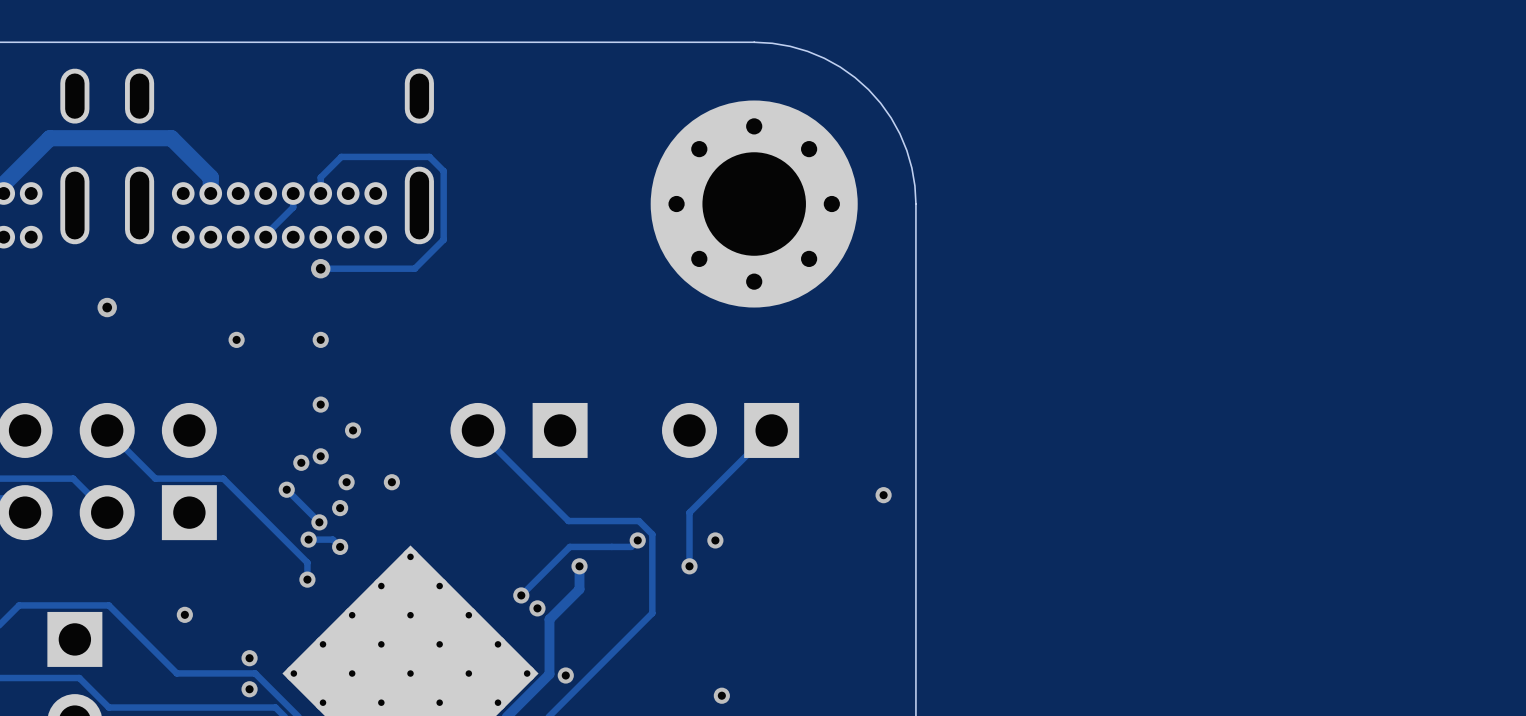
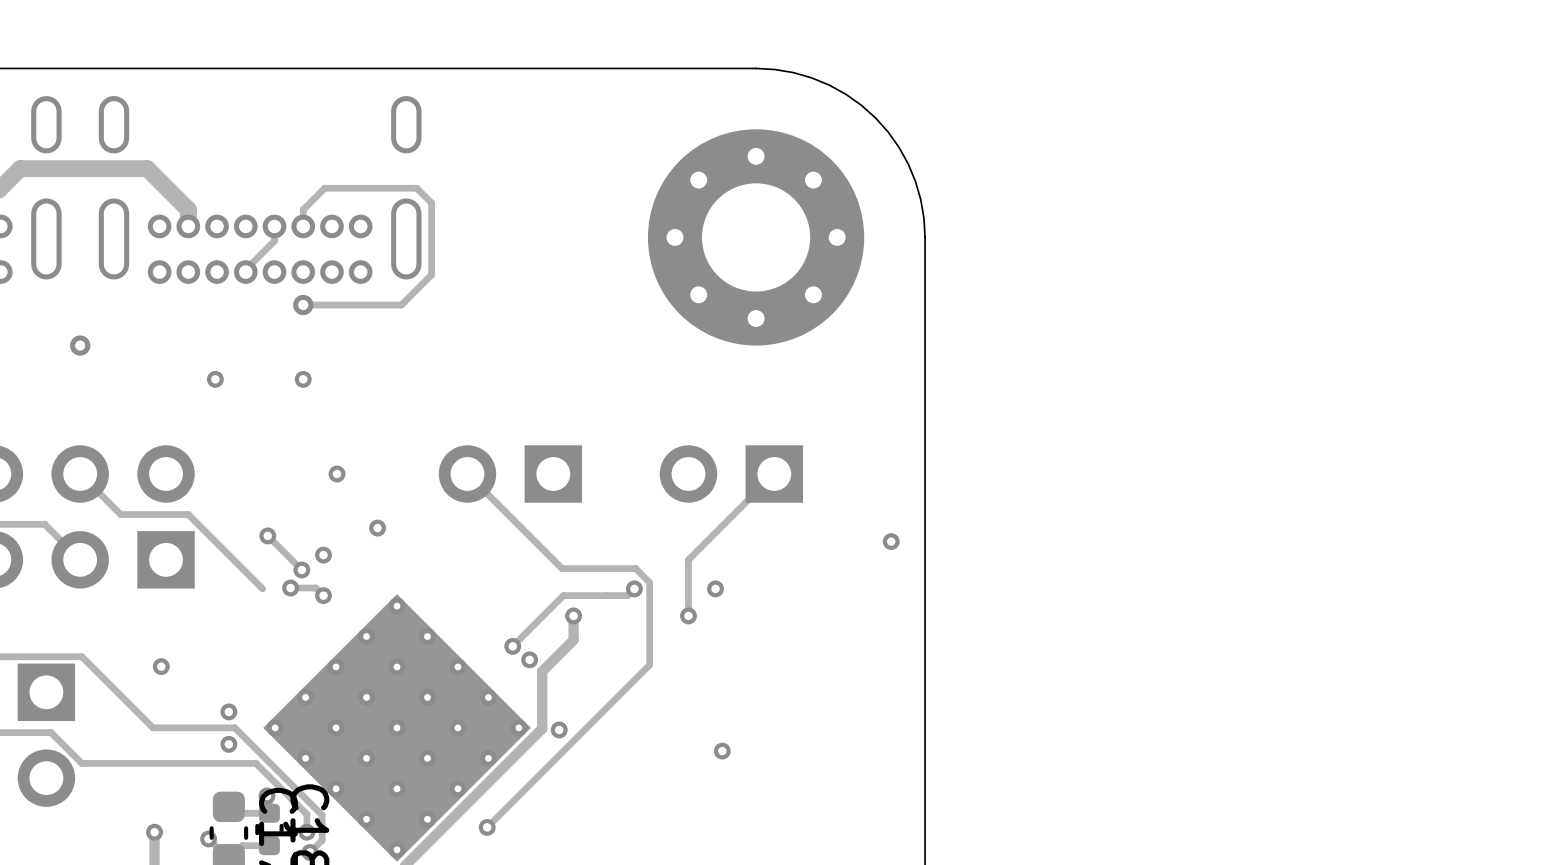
via: (320, 404) -> none
via: (320, 456) -> none
via: (301, 462) -> none
track: (146, 469) (155, 478) (223, 478) (307, 562) (307, 579) -> (120, 514) (188, 514) (262, 588)
via: (346, 482) -> none
via: (307, 579) -> none

